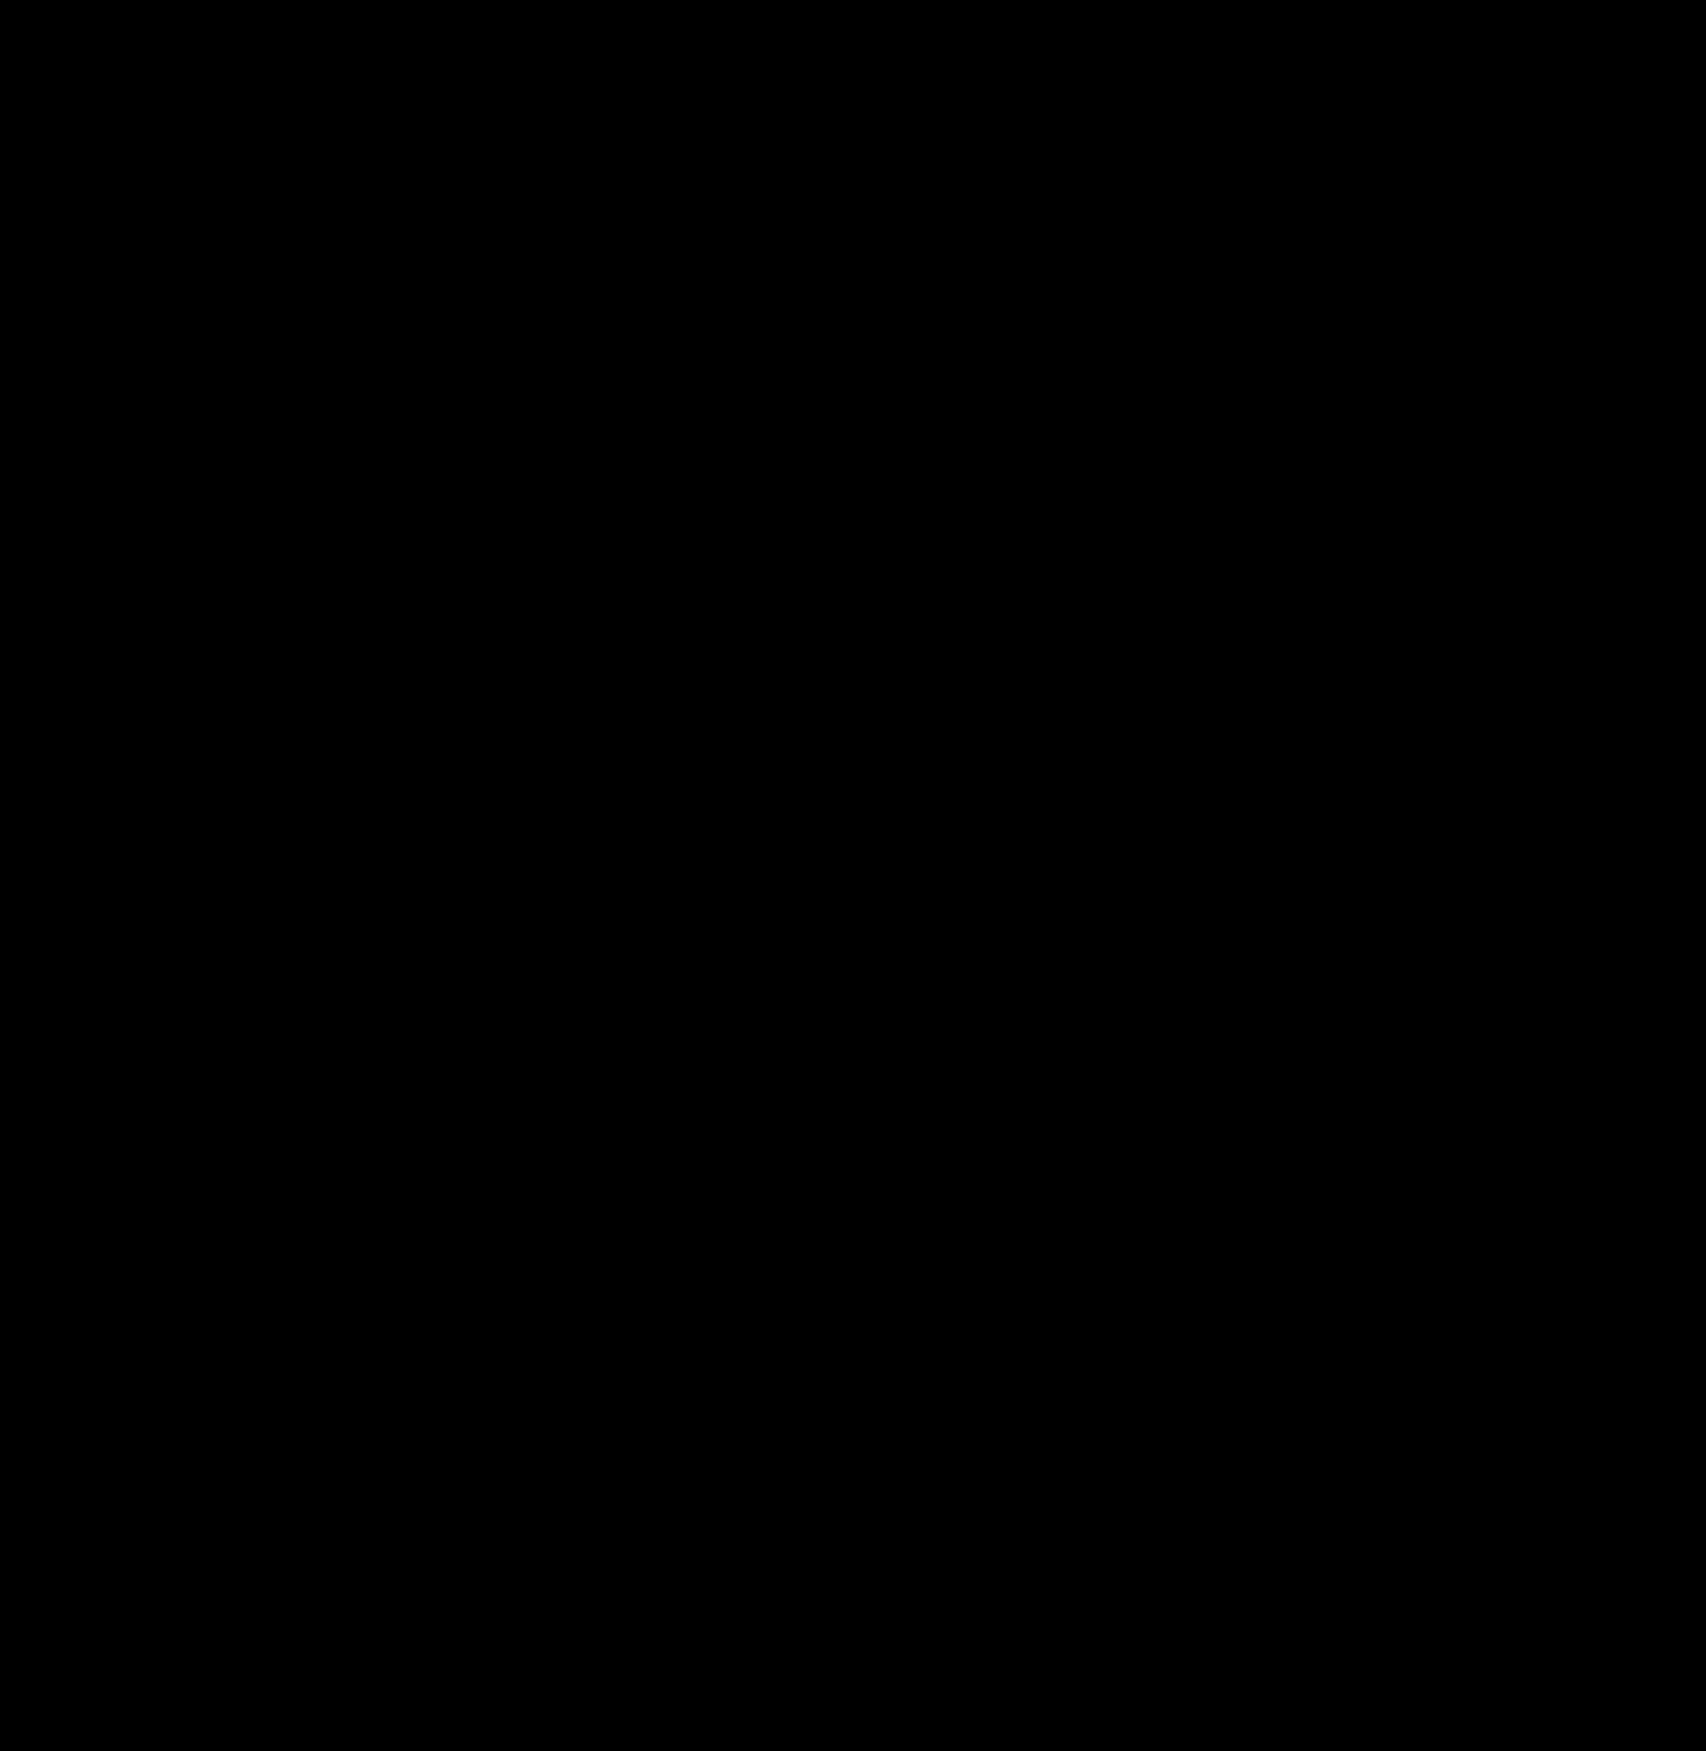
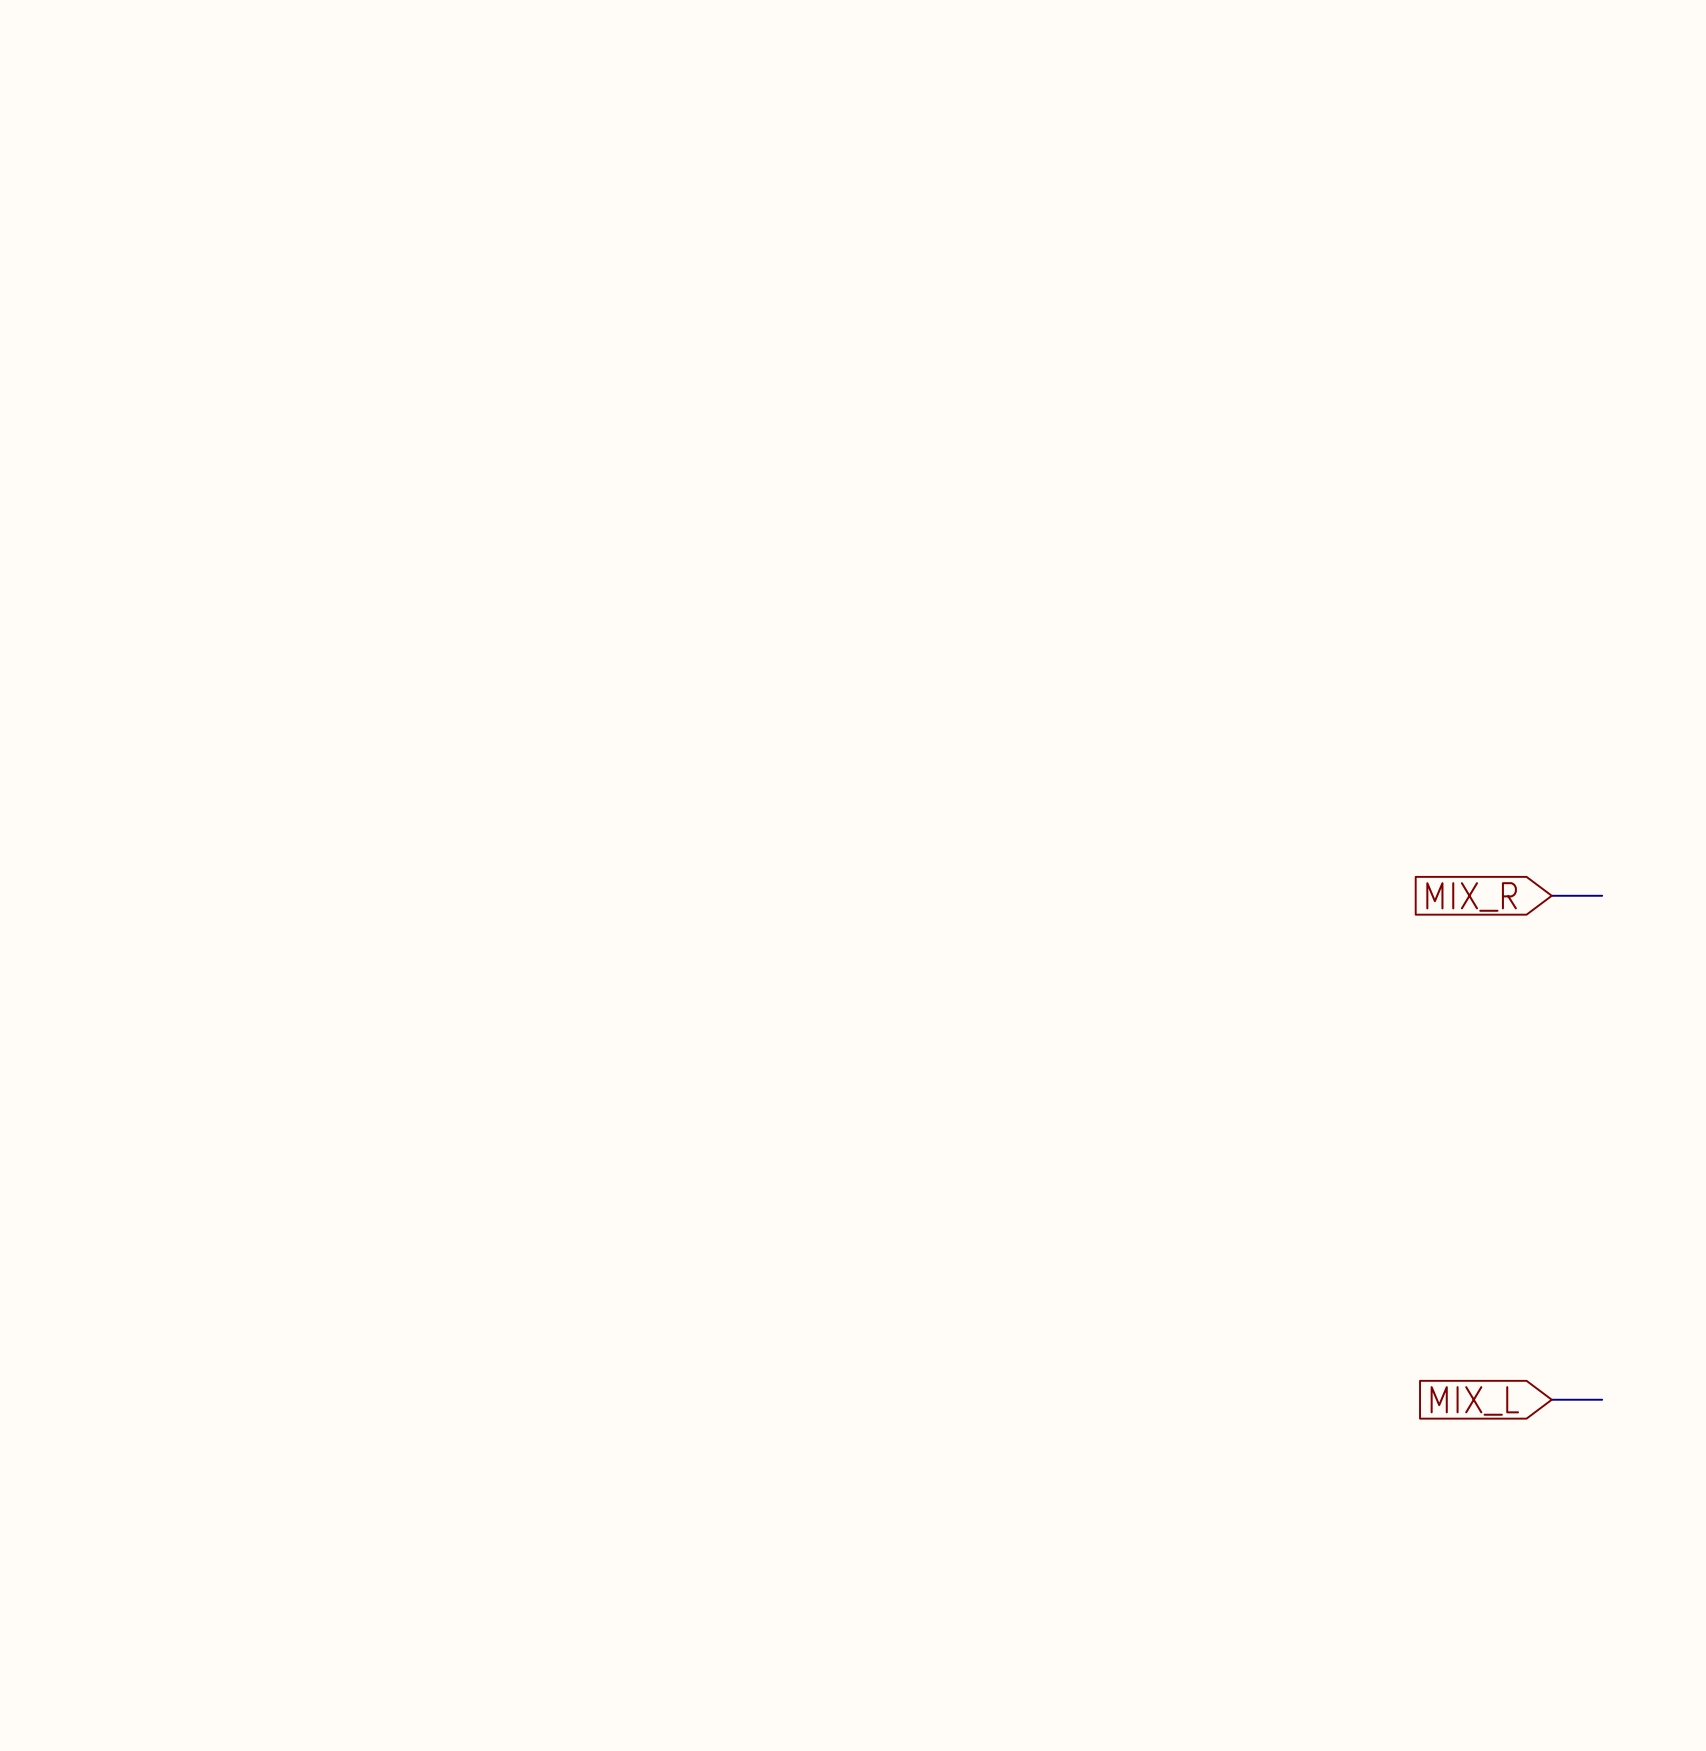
wire: none -> (1551, 895) (1602, 895)
global label: none -> MIX_R (1471, 896)
wire: none -> (1551, 1399) (1602, 1399)
global label: none -> MIX_L (1474, 1400)

